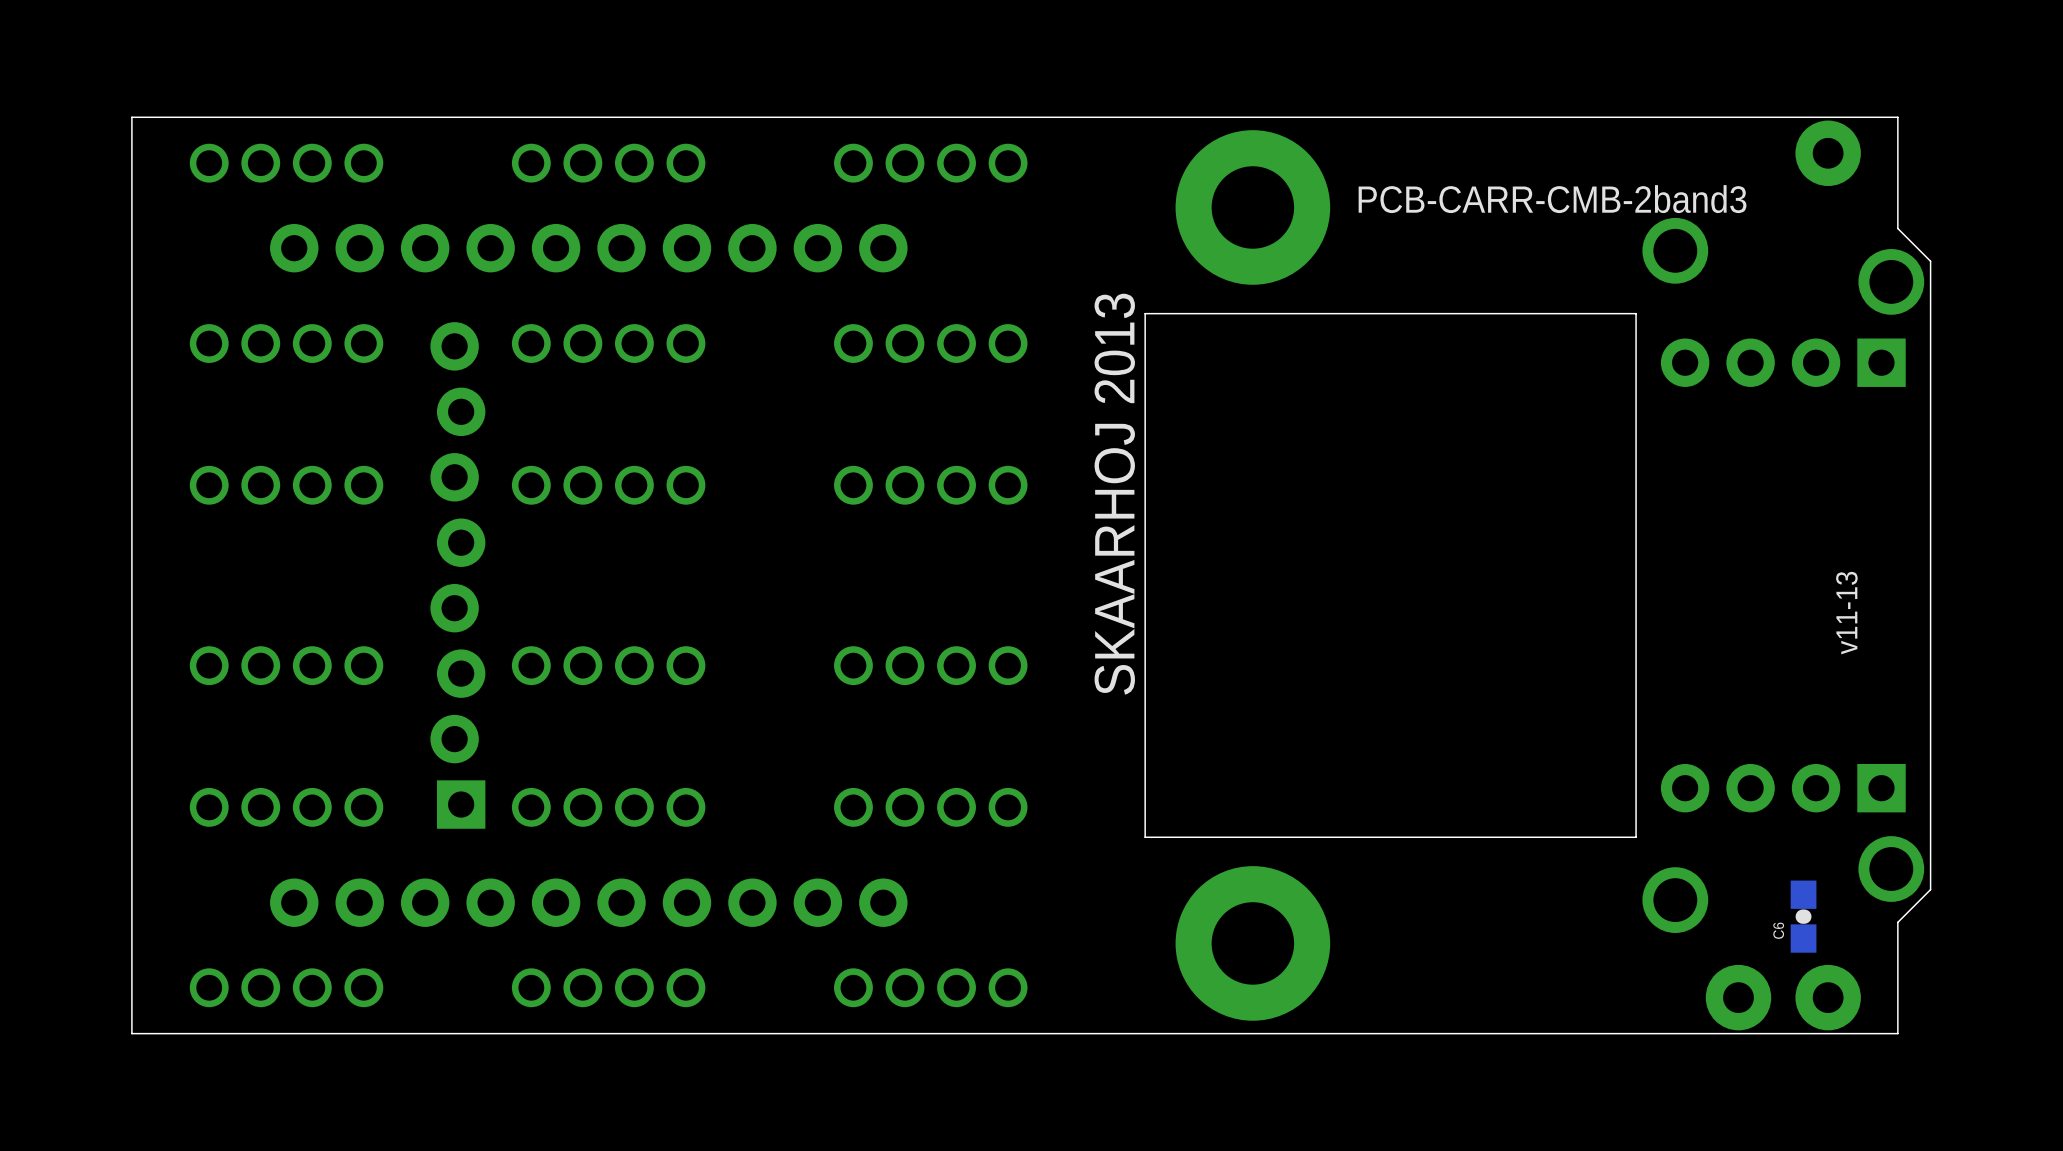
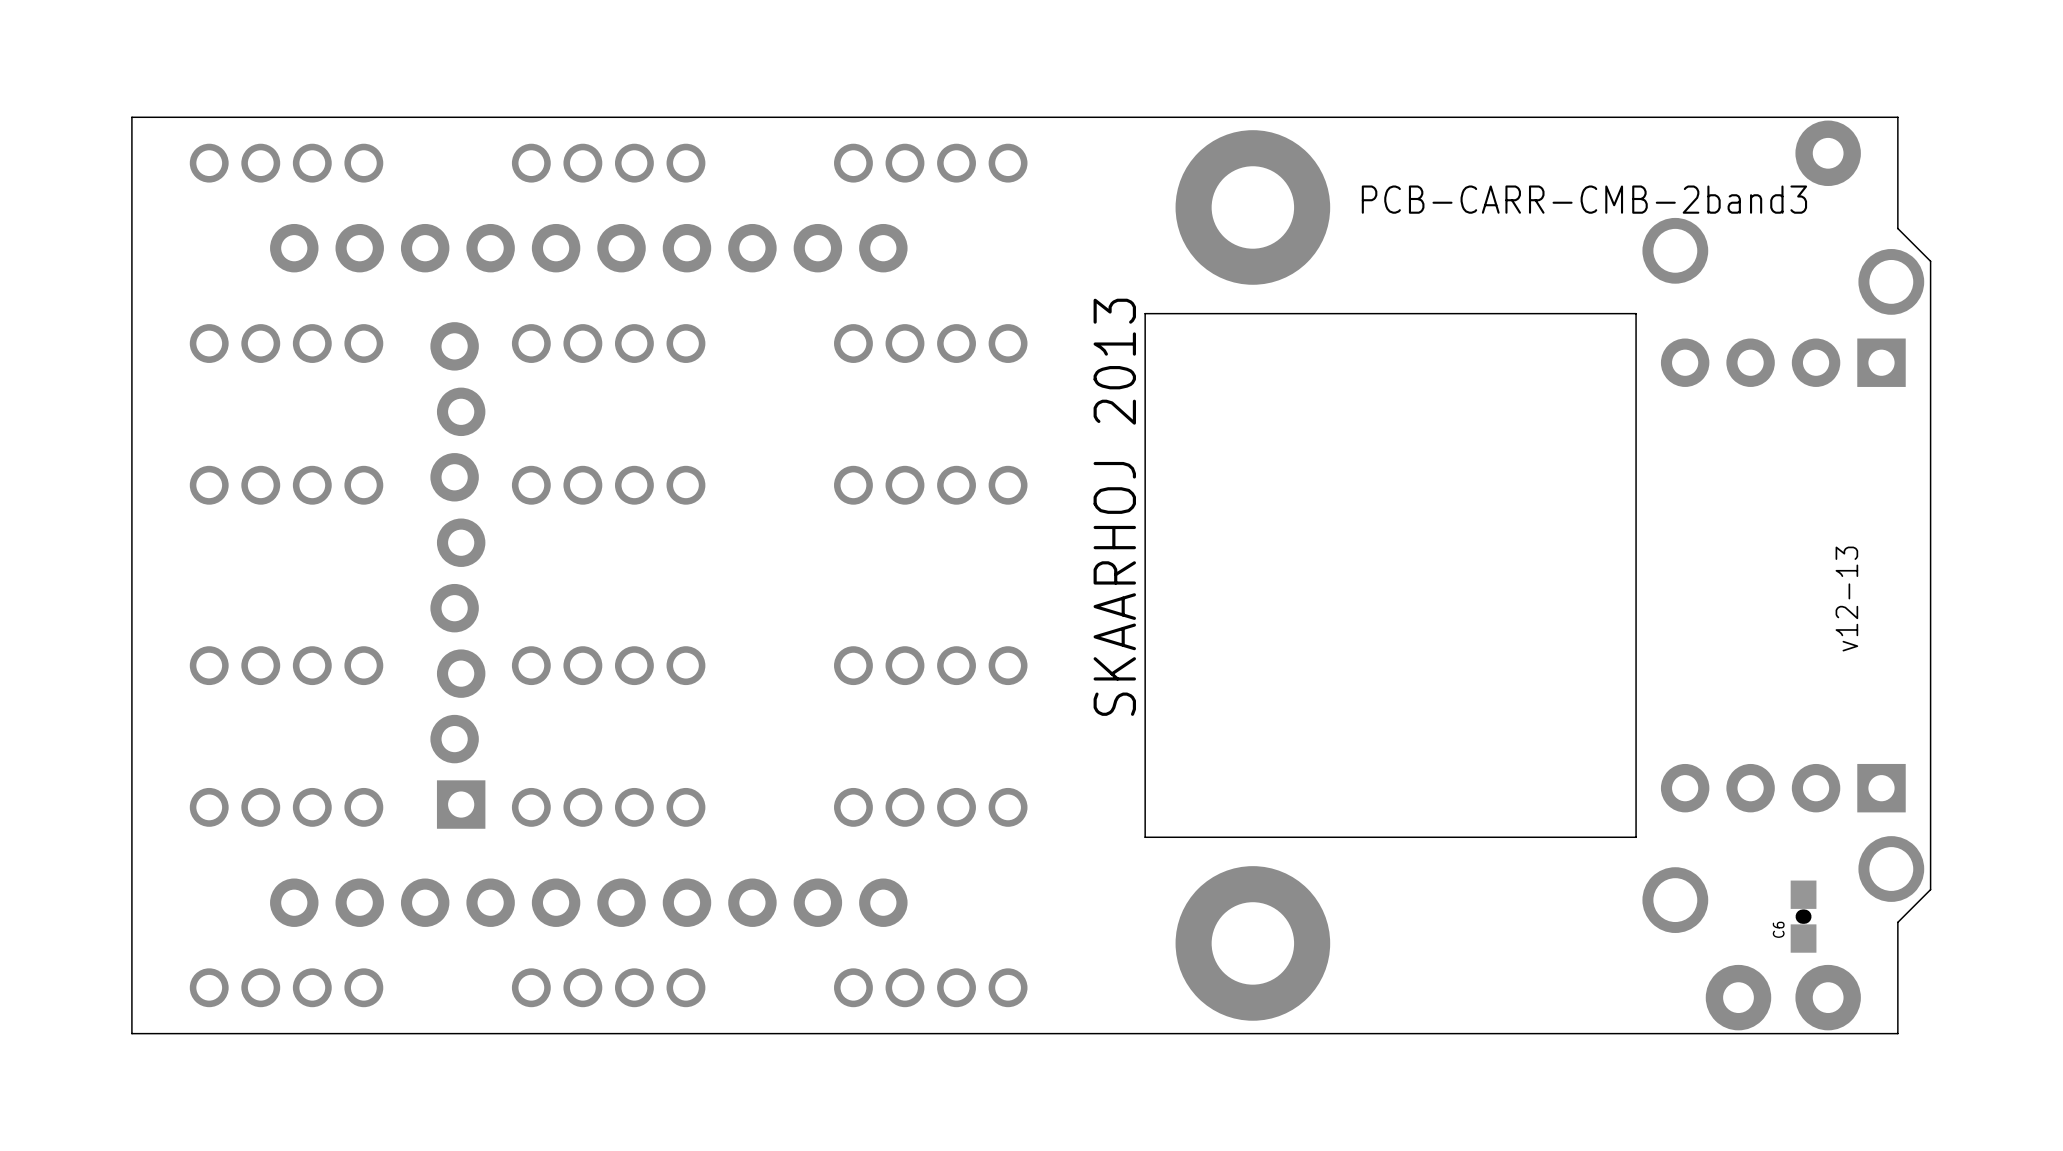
text: v11-13 (1846, 613) -> v12-13 (1846, 599)

